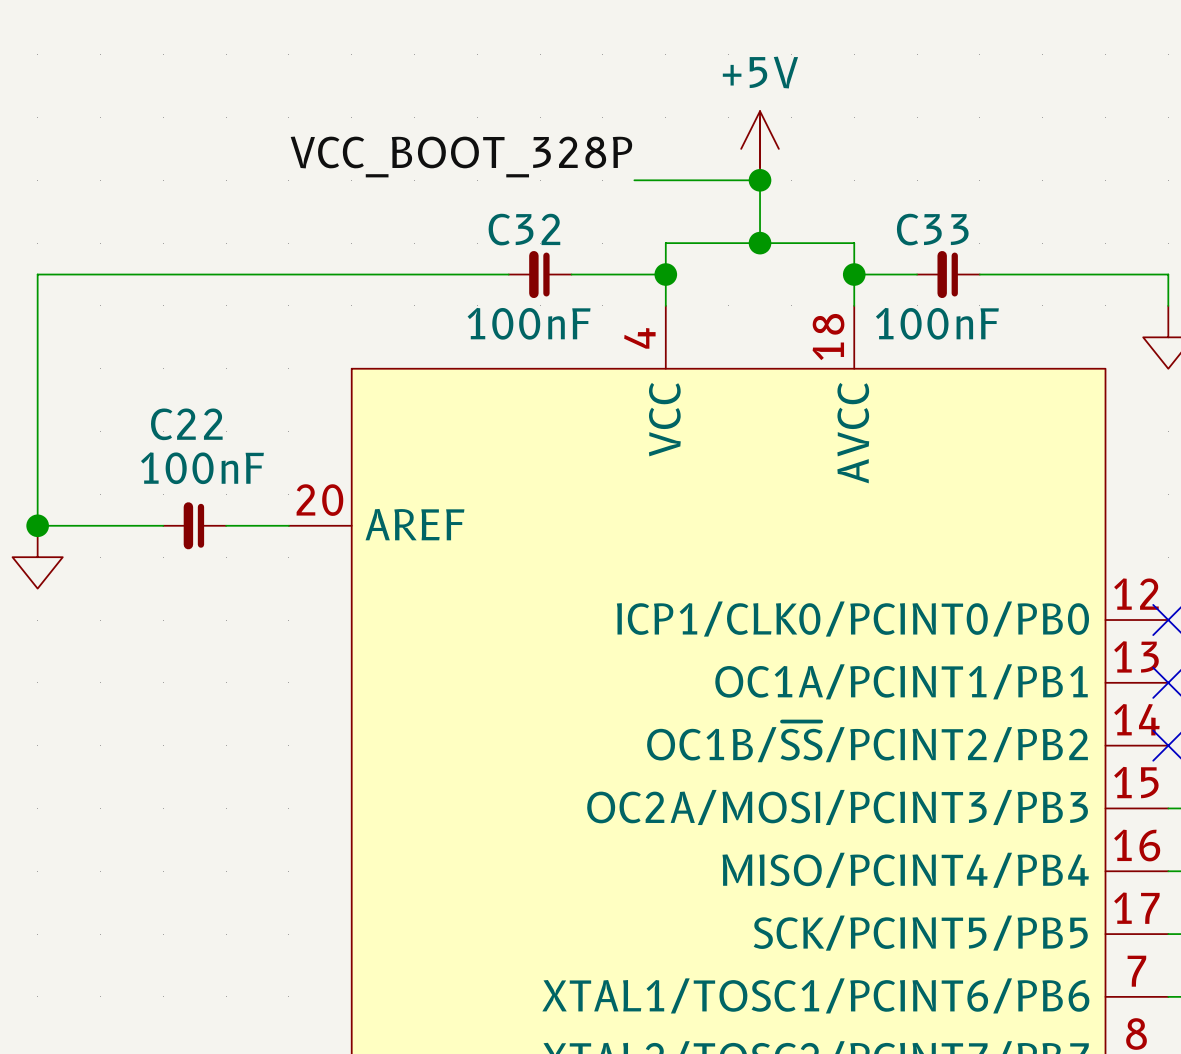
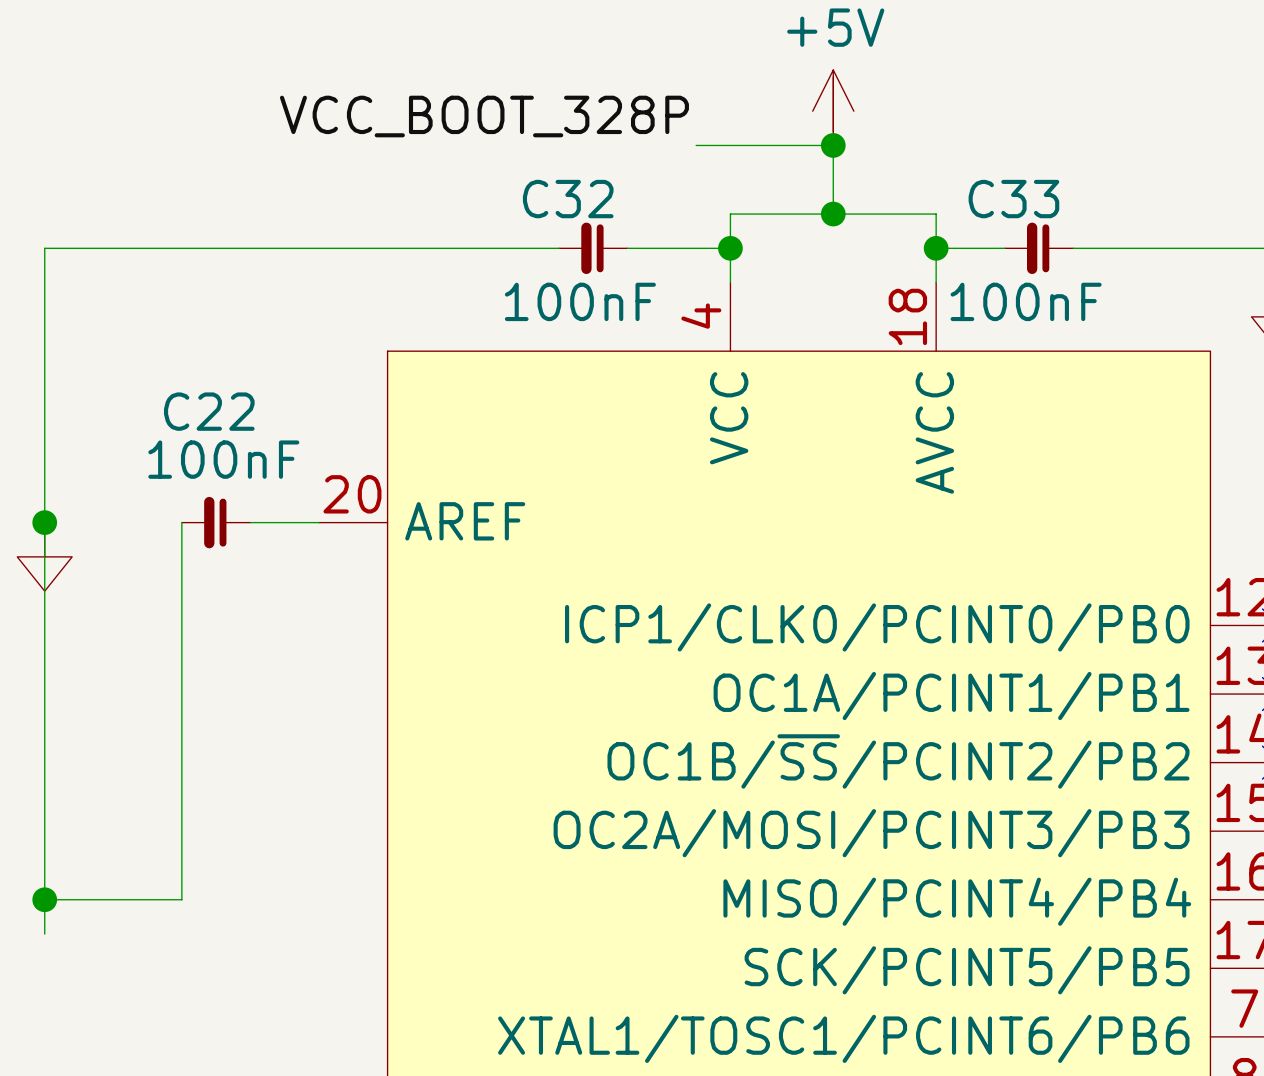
wire: (37, 525) (163, 525) -> (44, 899) (181, 899) (181, 522)
wire: none -> (44, 522) (44, 934)
junction: none -> (44, 899)

